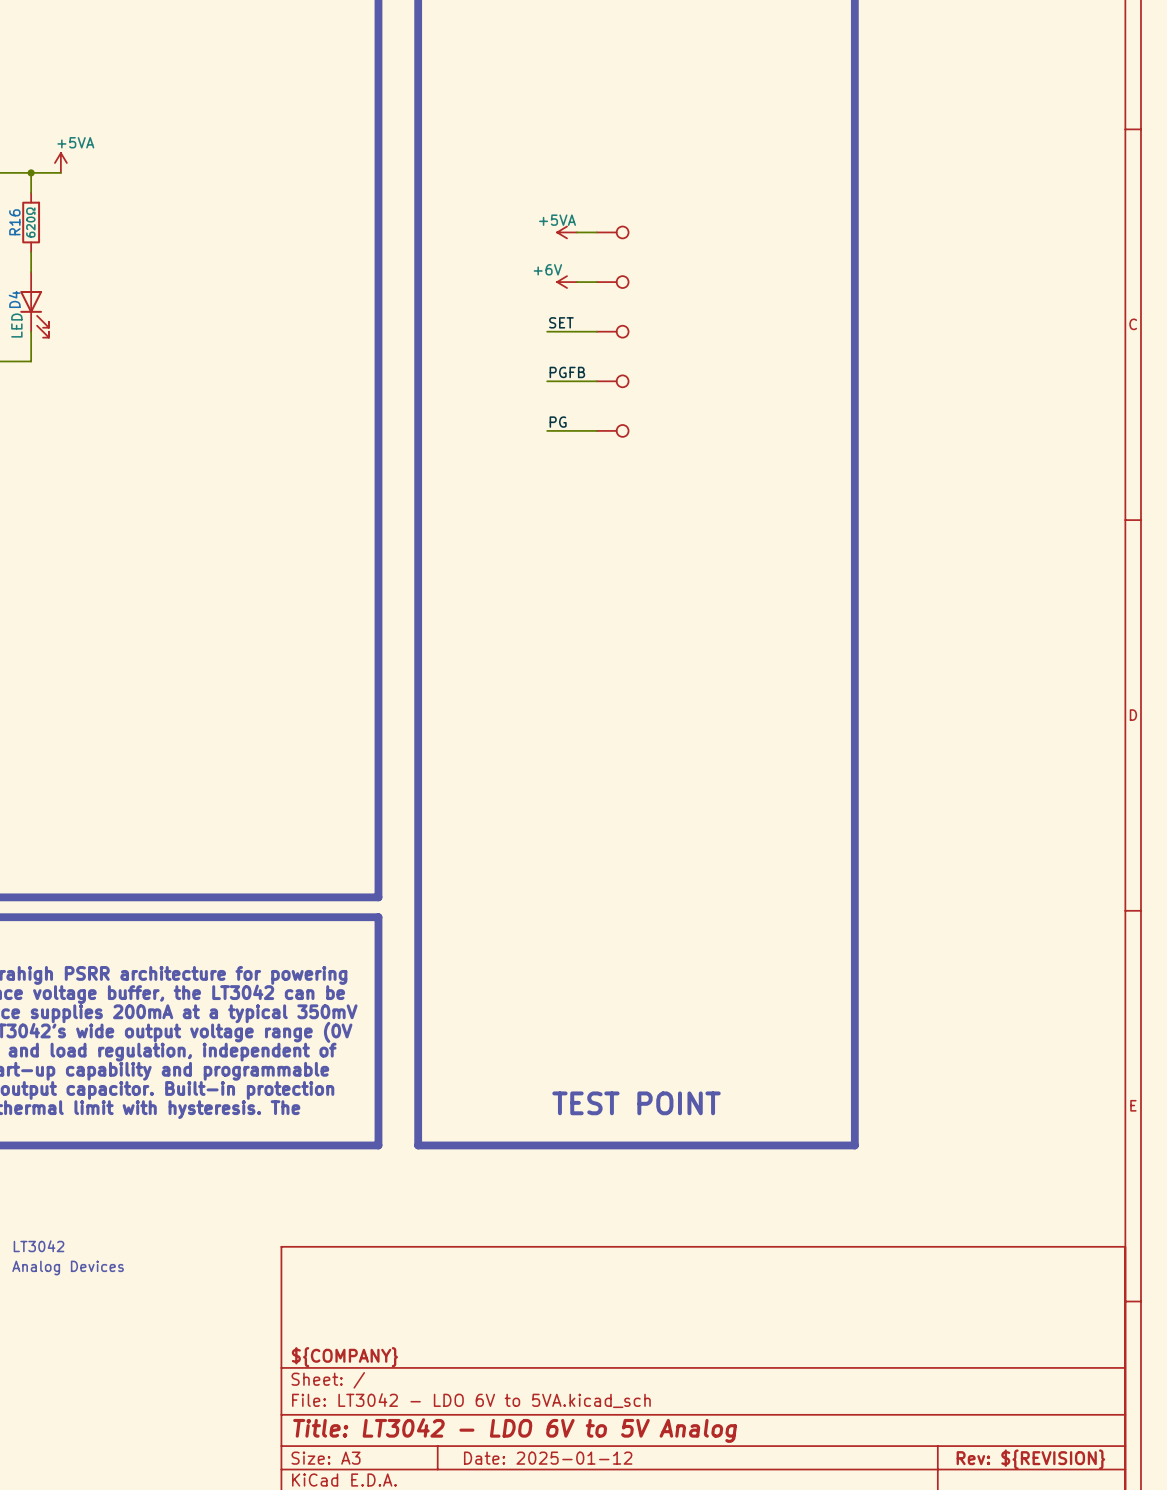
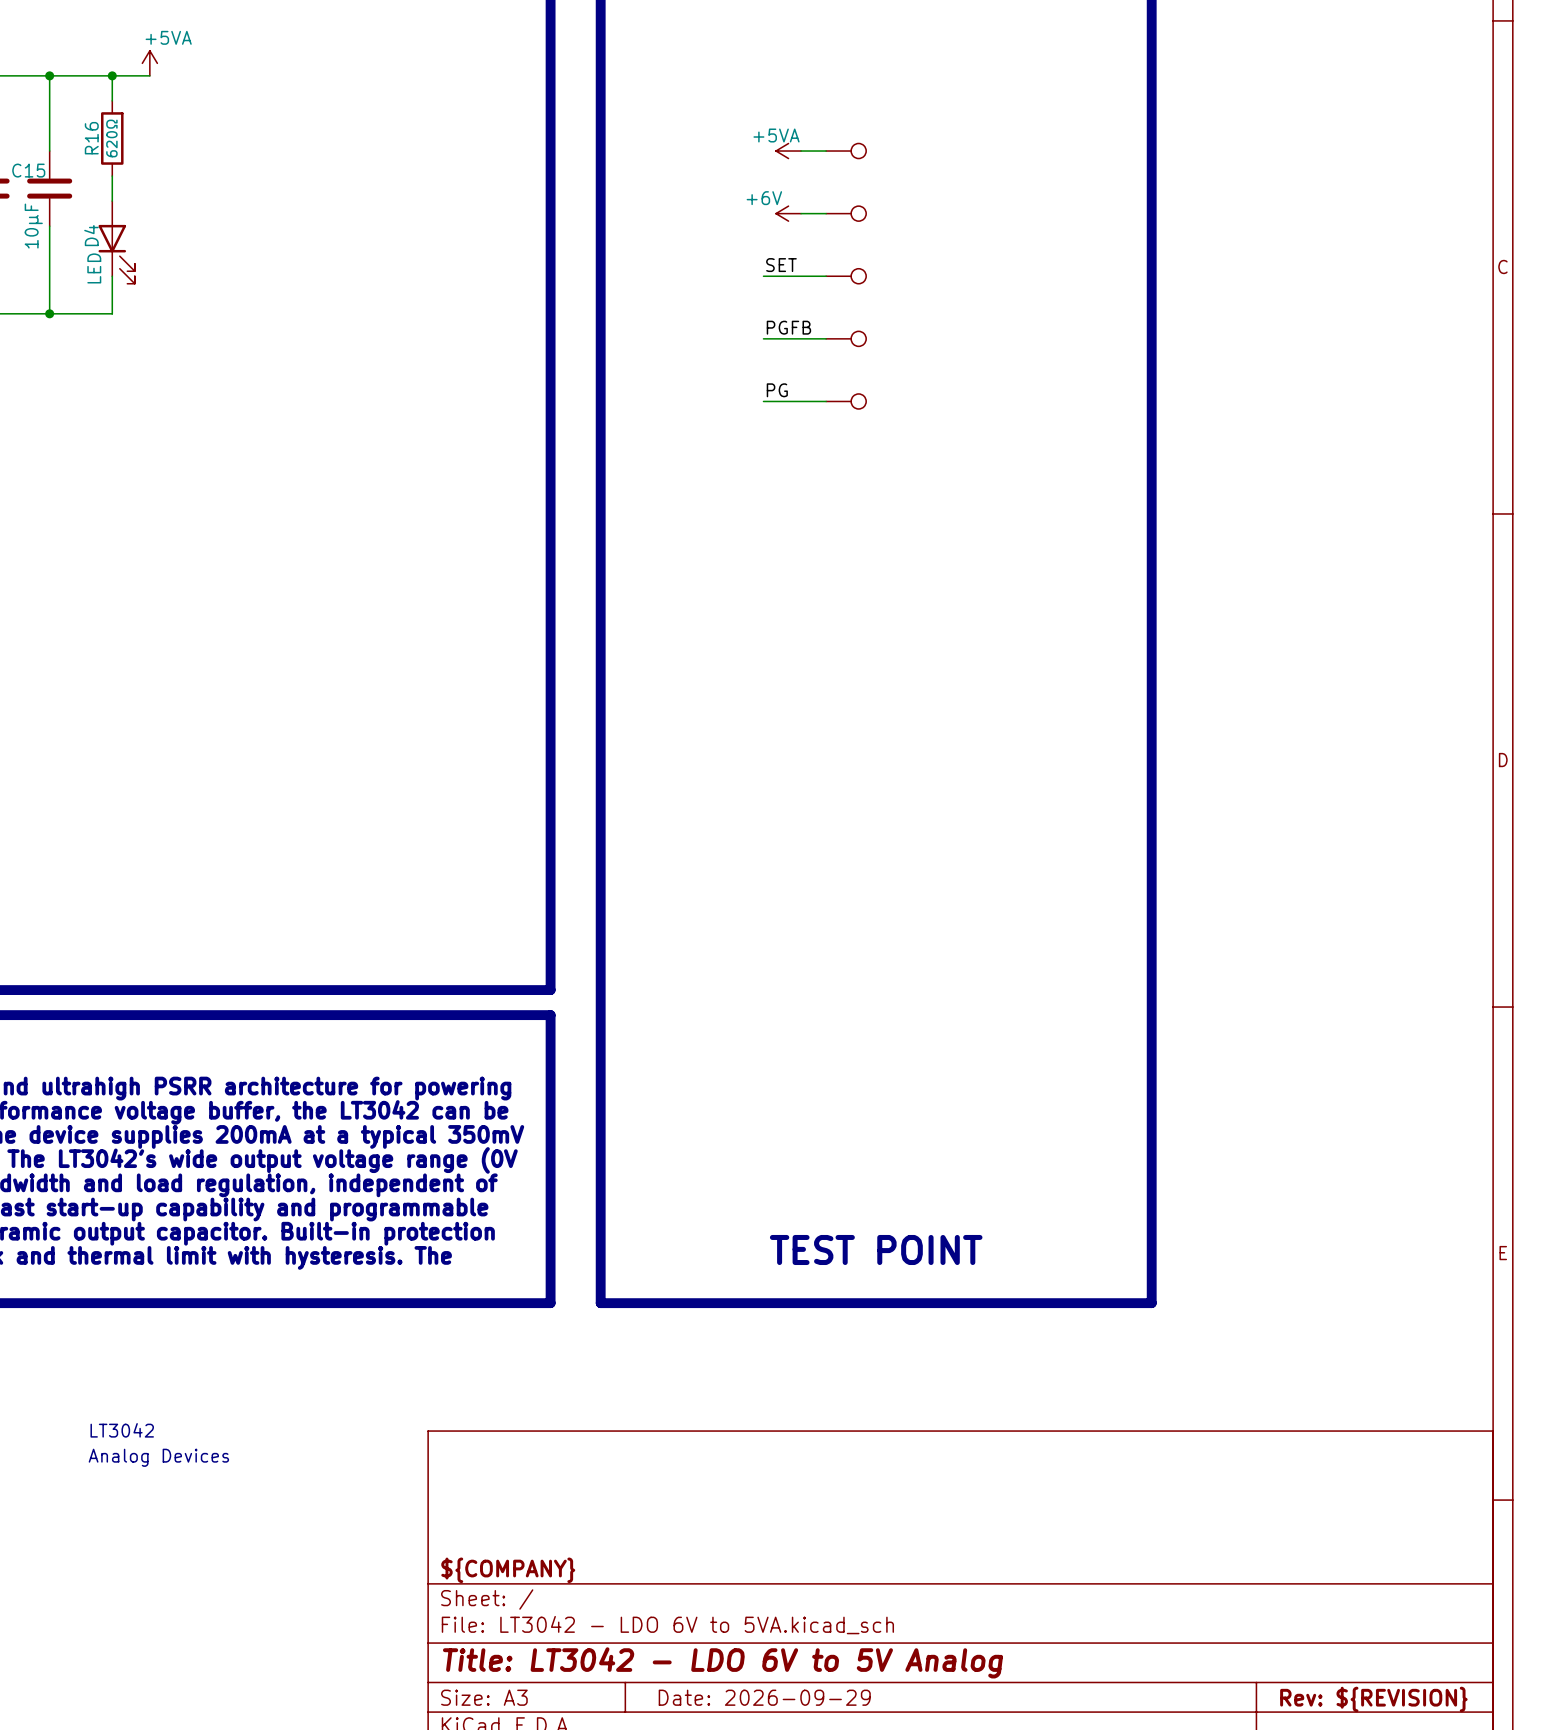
title block: Date: 2025-01-12 (548, 1458) -> Date: 2026-09-29 (764, 1697)

